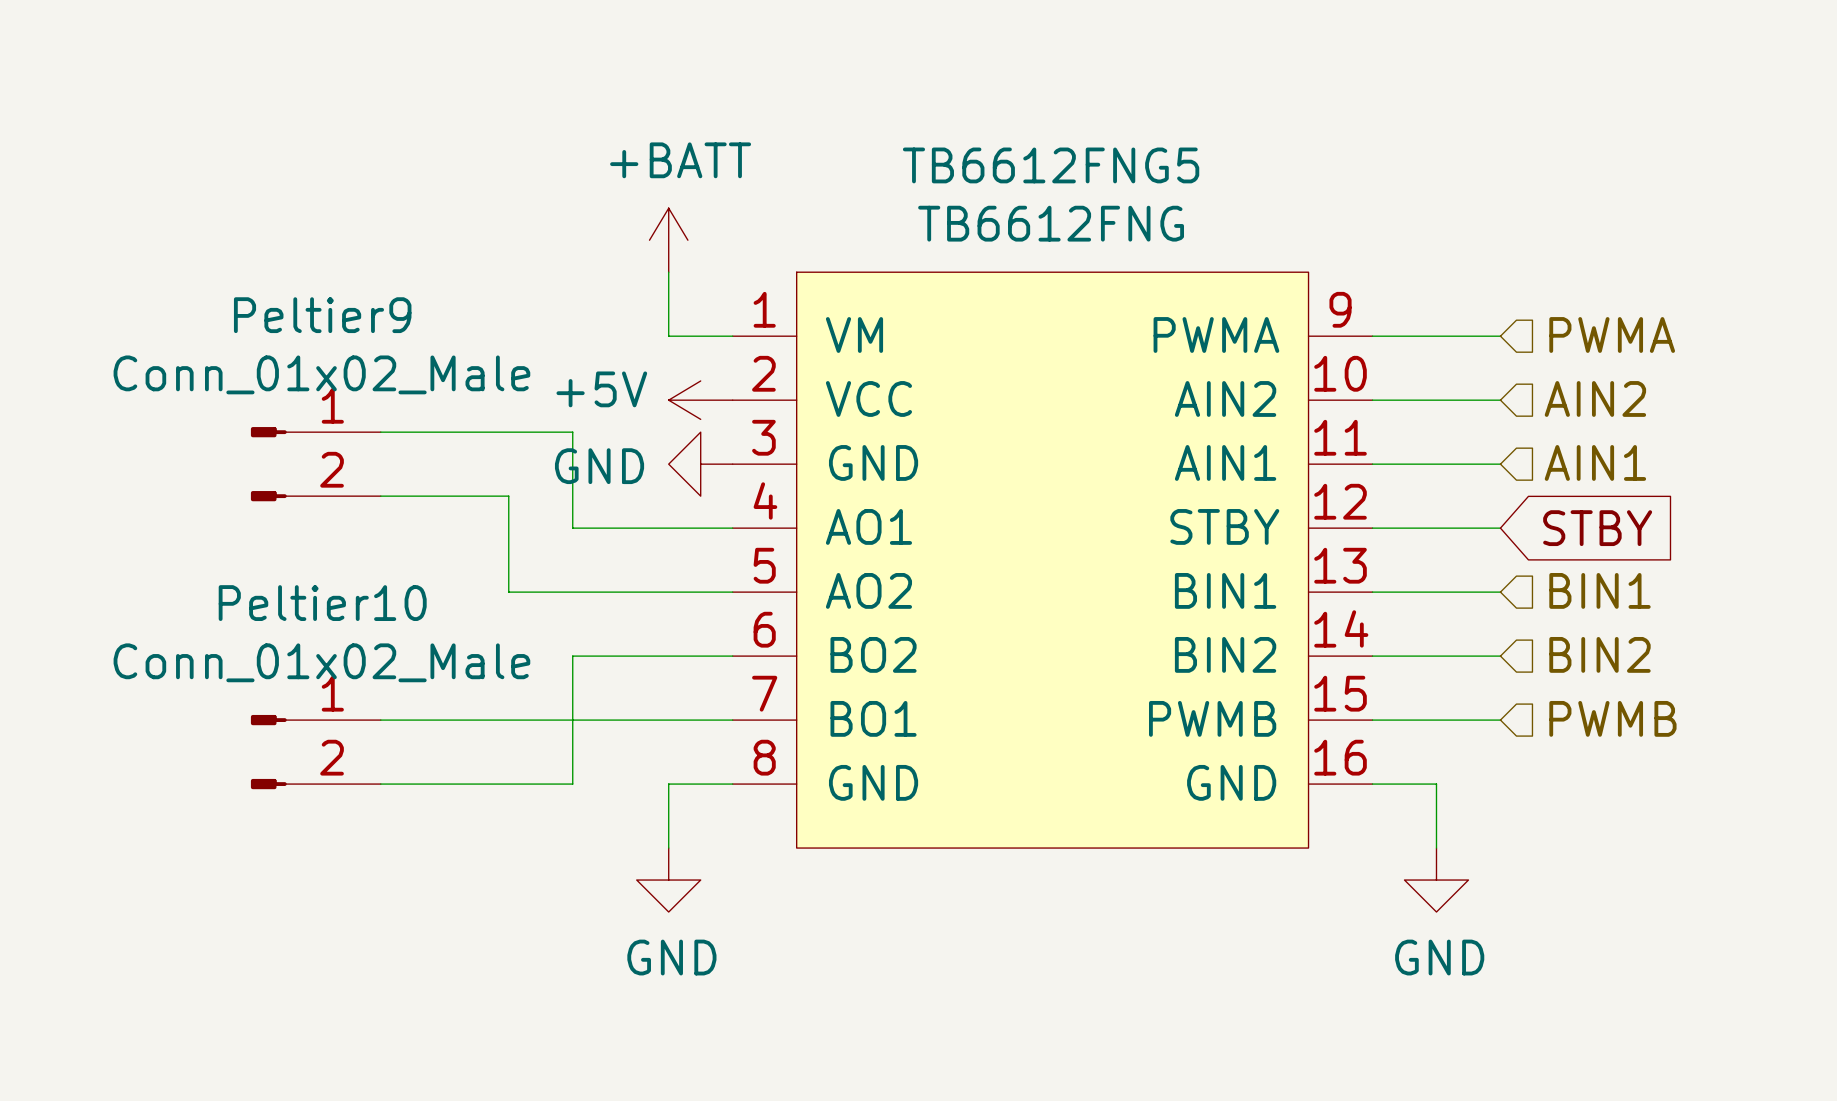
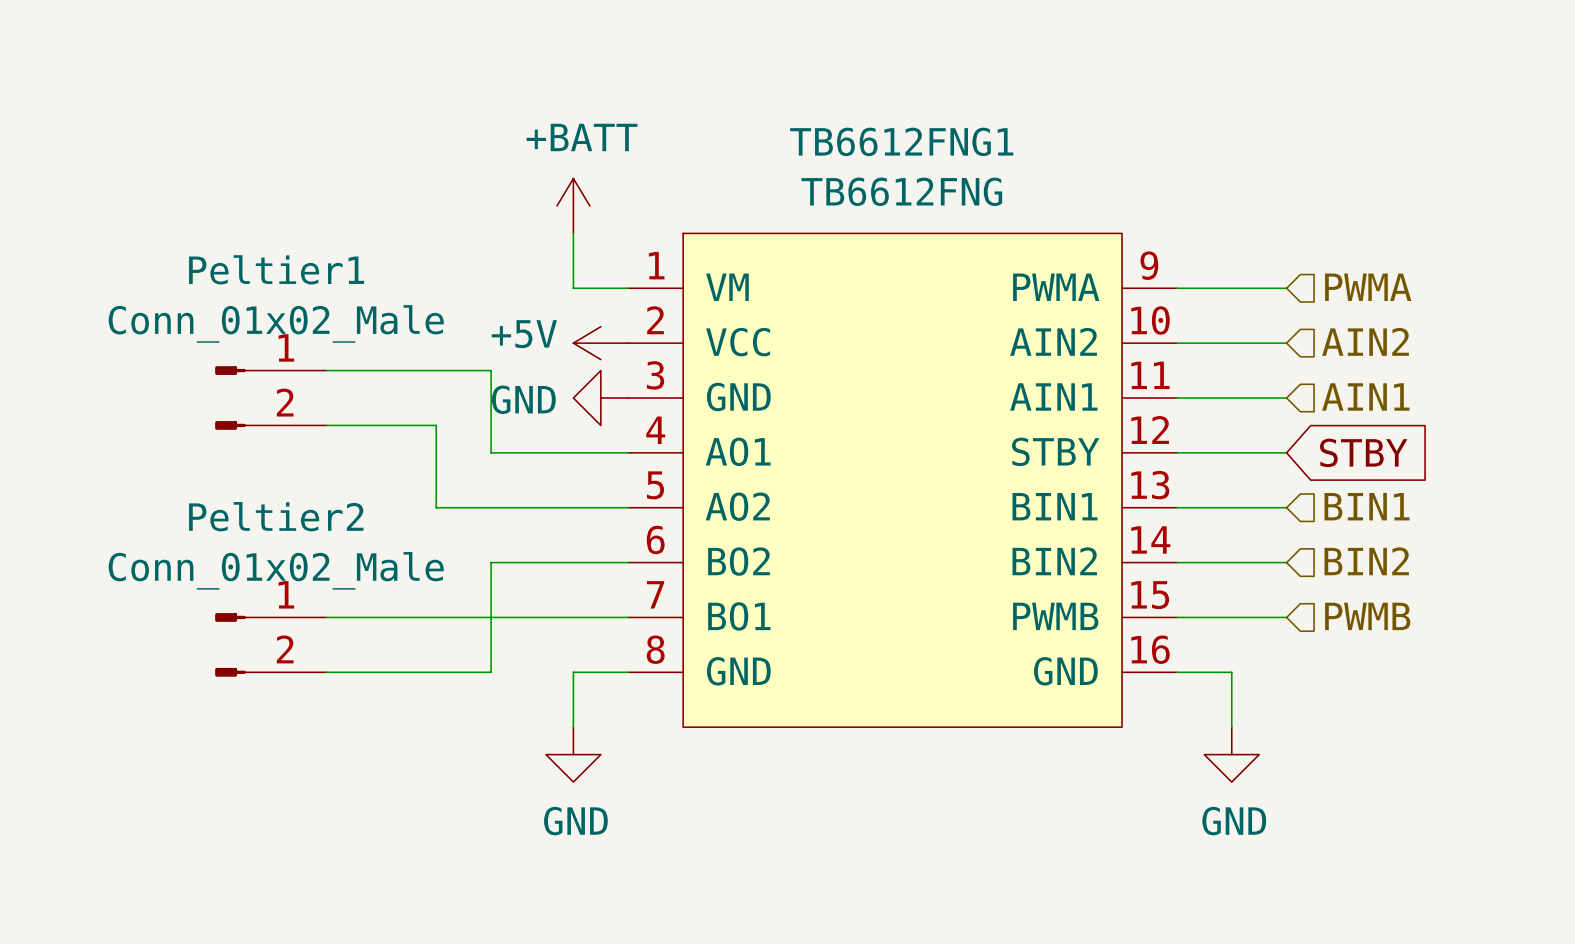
TB6612FNG5 name: TB6612FNG5 (1051, 165) -> TB6612FNG1 (901, 141)
Peltier9 name: Peltier9 (322, 315) -> Peltier1 (276, 269)
Peltier10 name: Peltier10 (322, 603) -> Peltier2 (276, 516)

